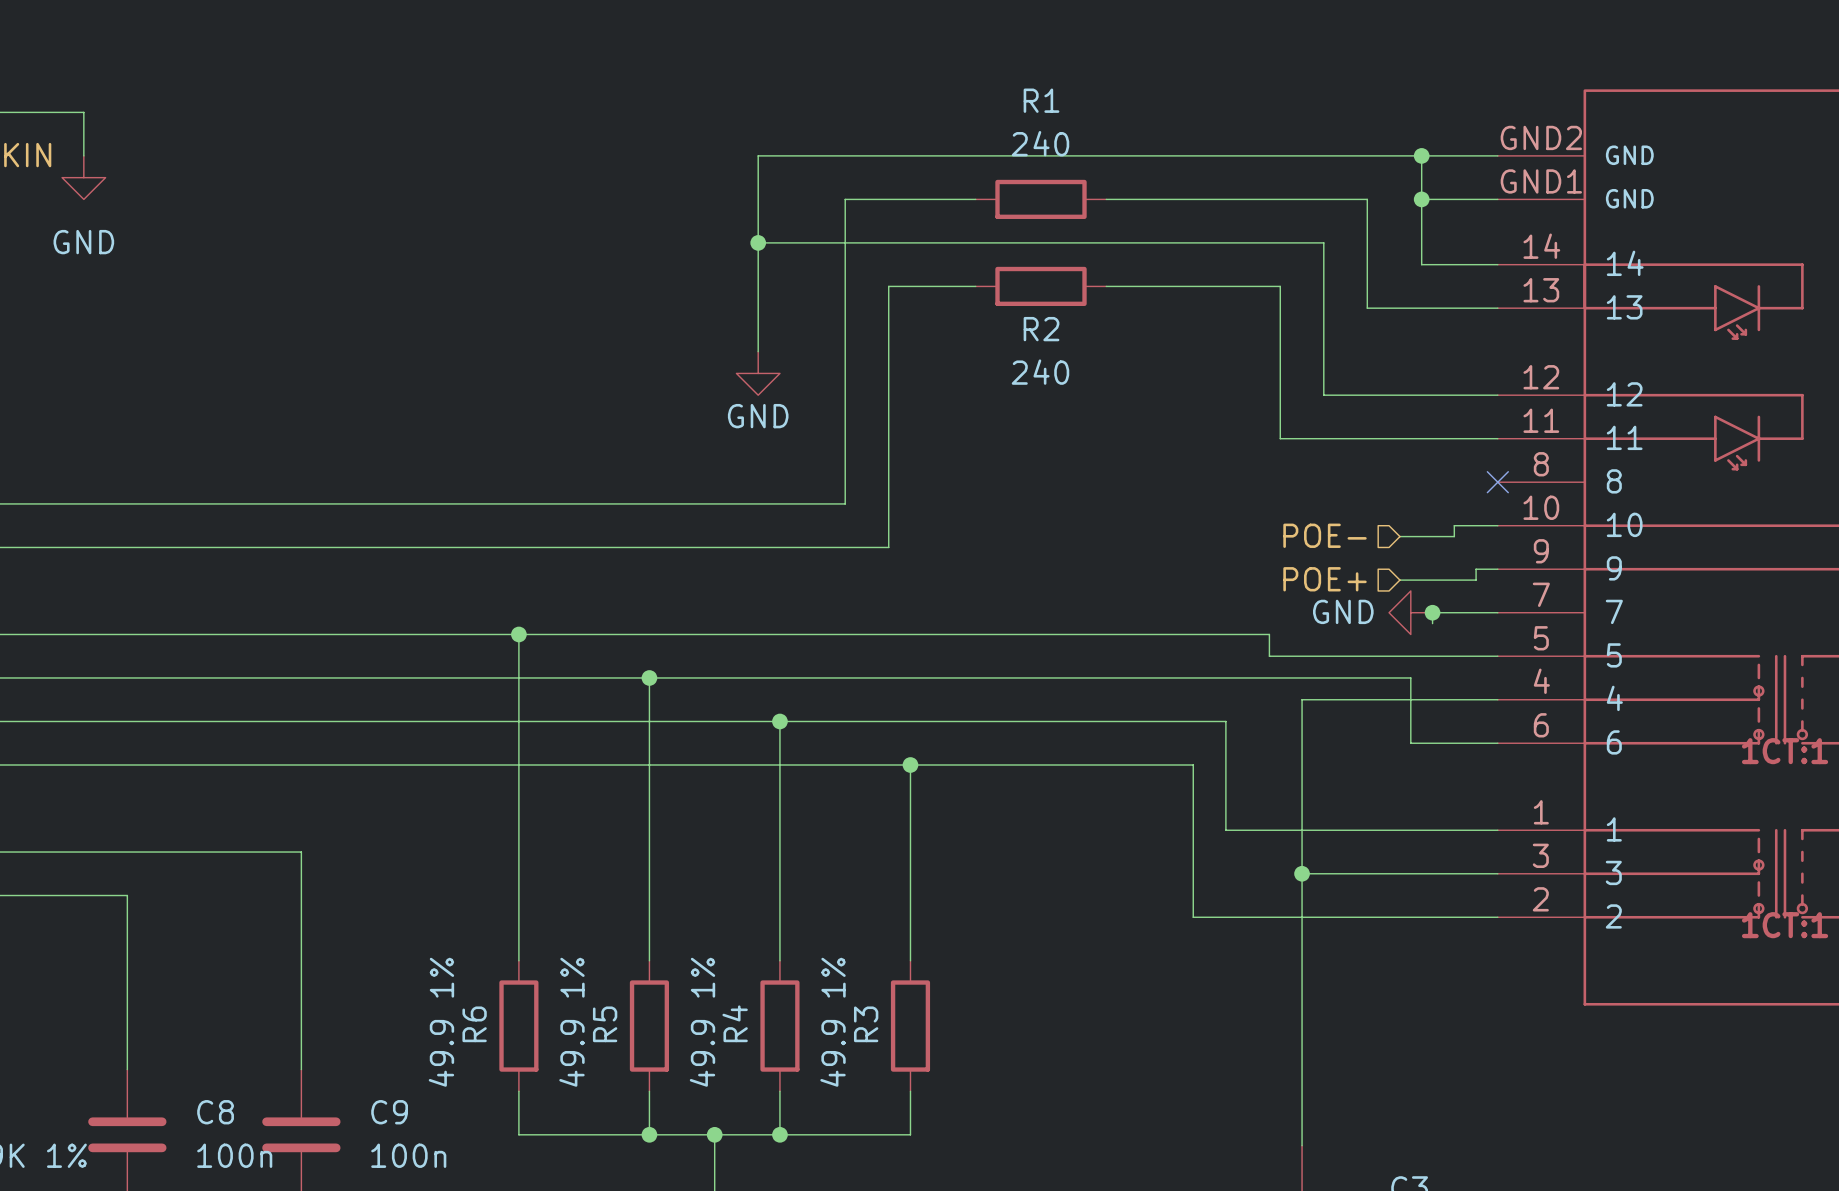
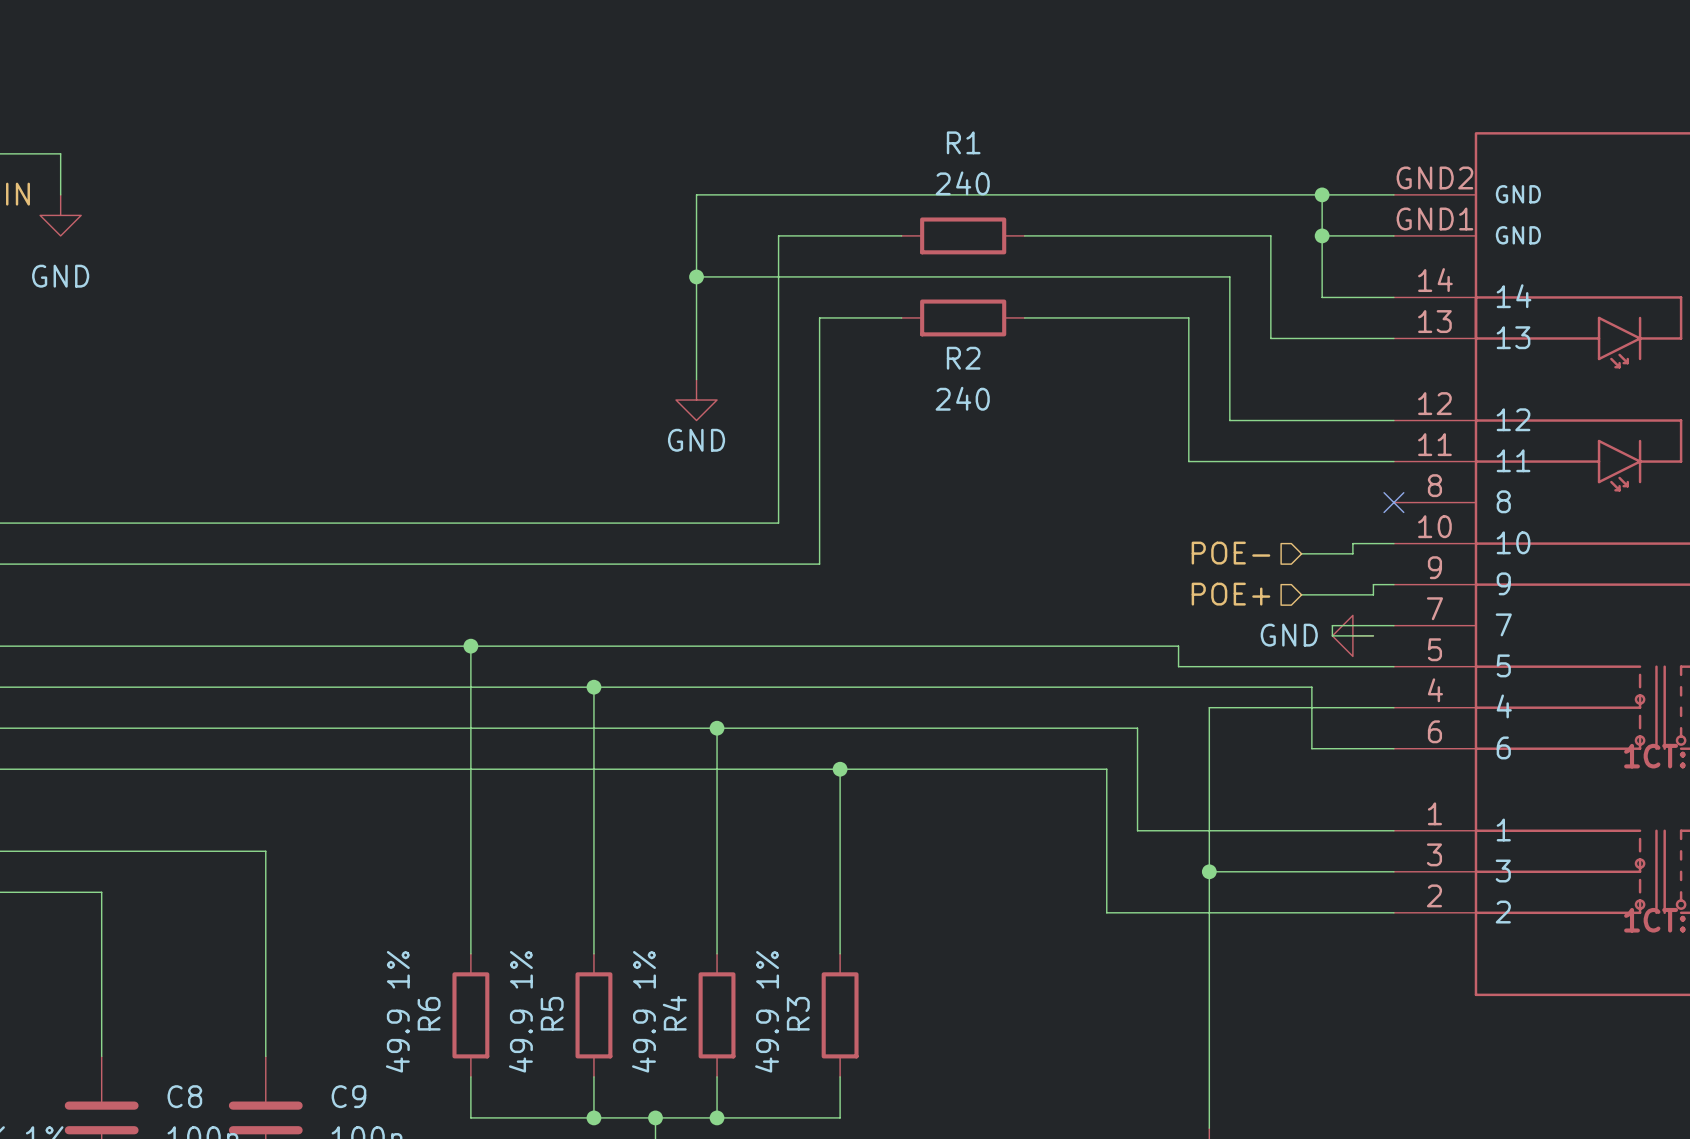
power symbol position: GND (1410, 612) -> GND (1352, 635)
junction: (1432, 612) -> none
wire: none -> (1332, 635) (1373, 635)

